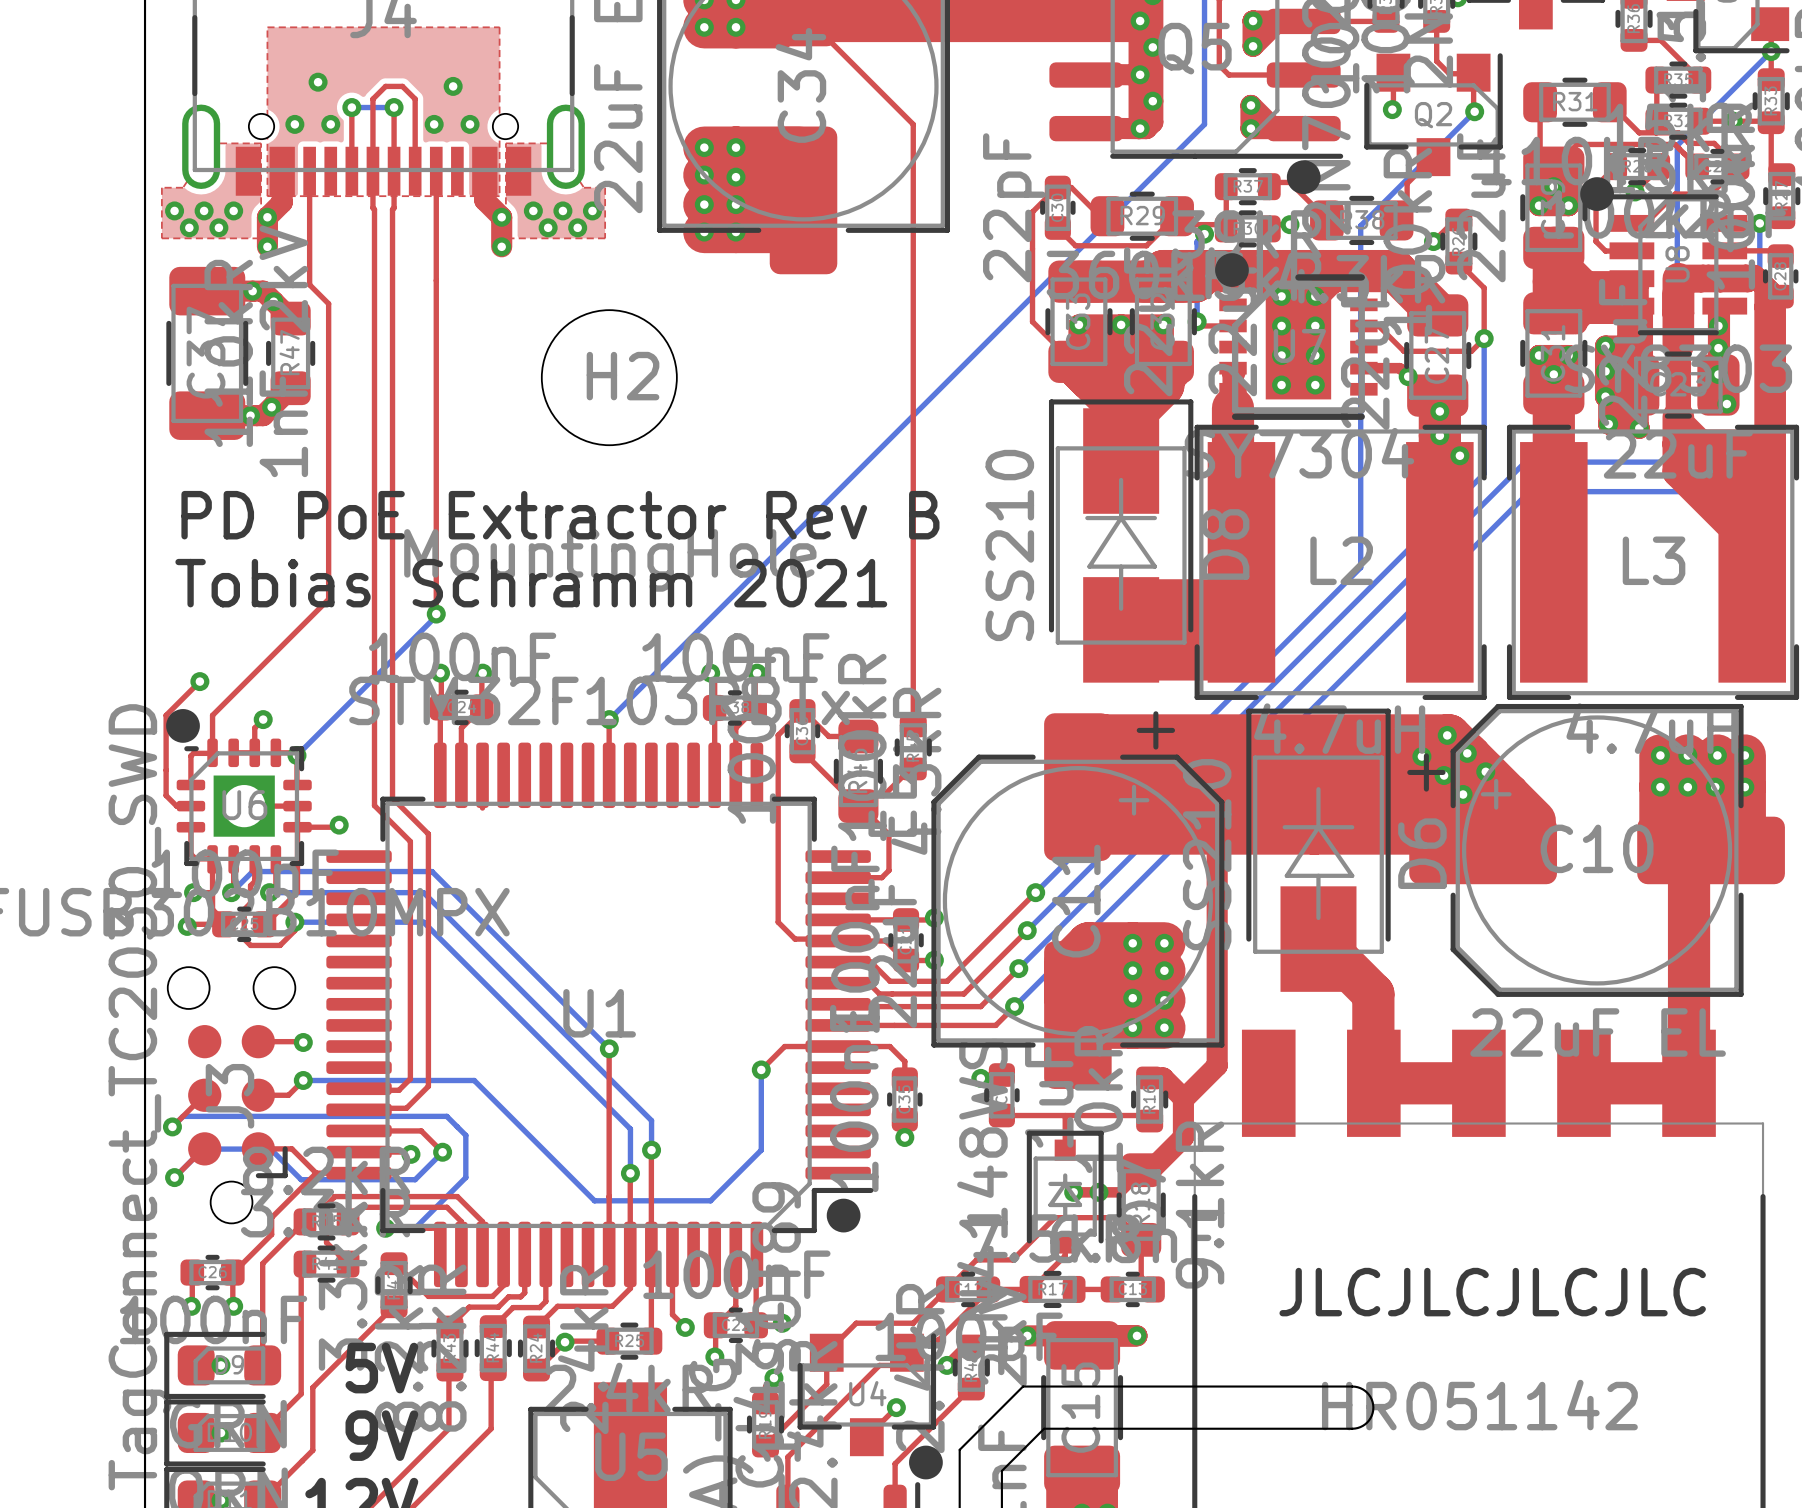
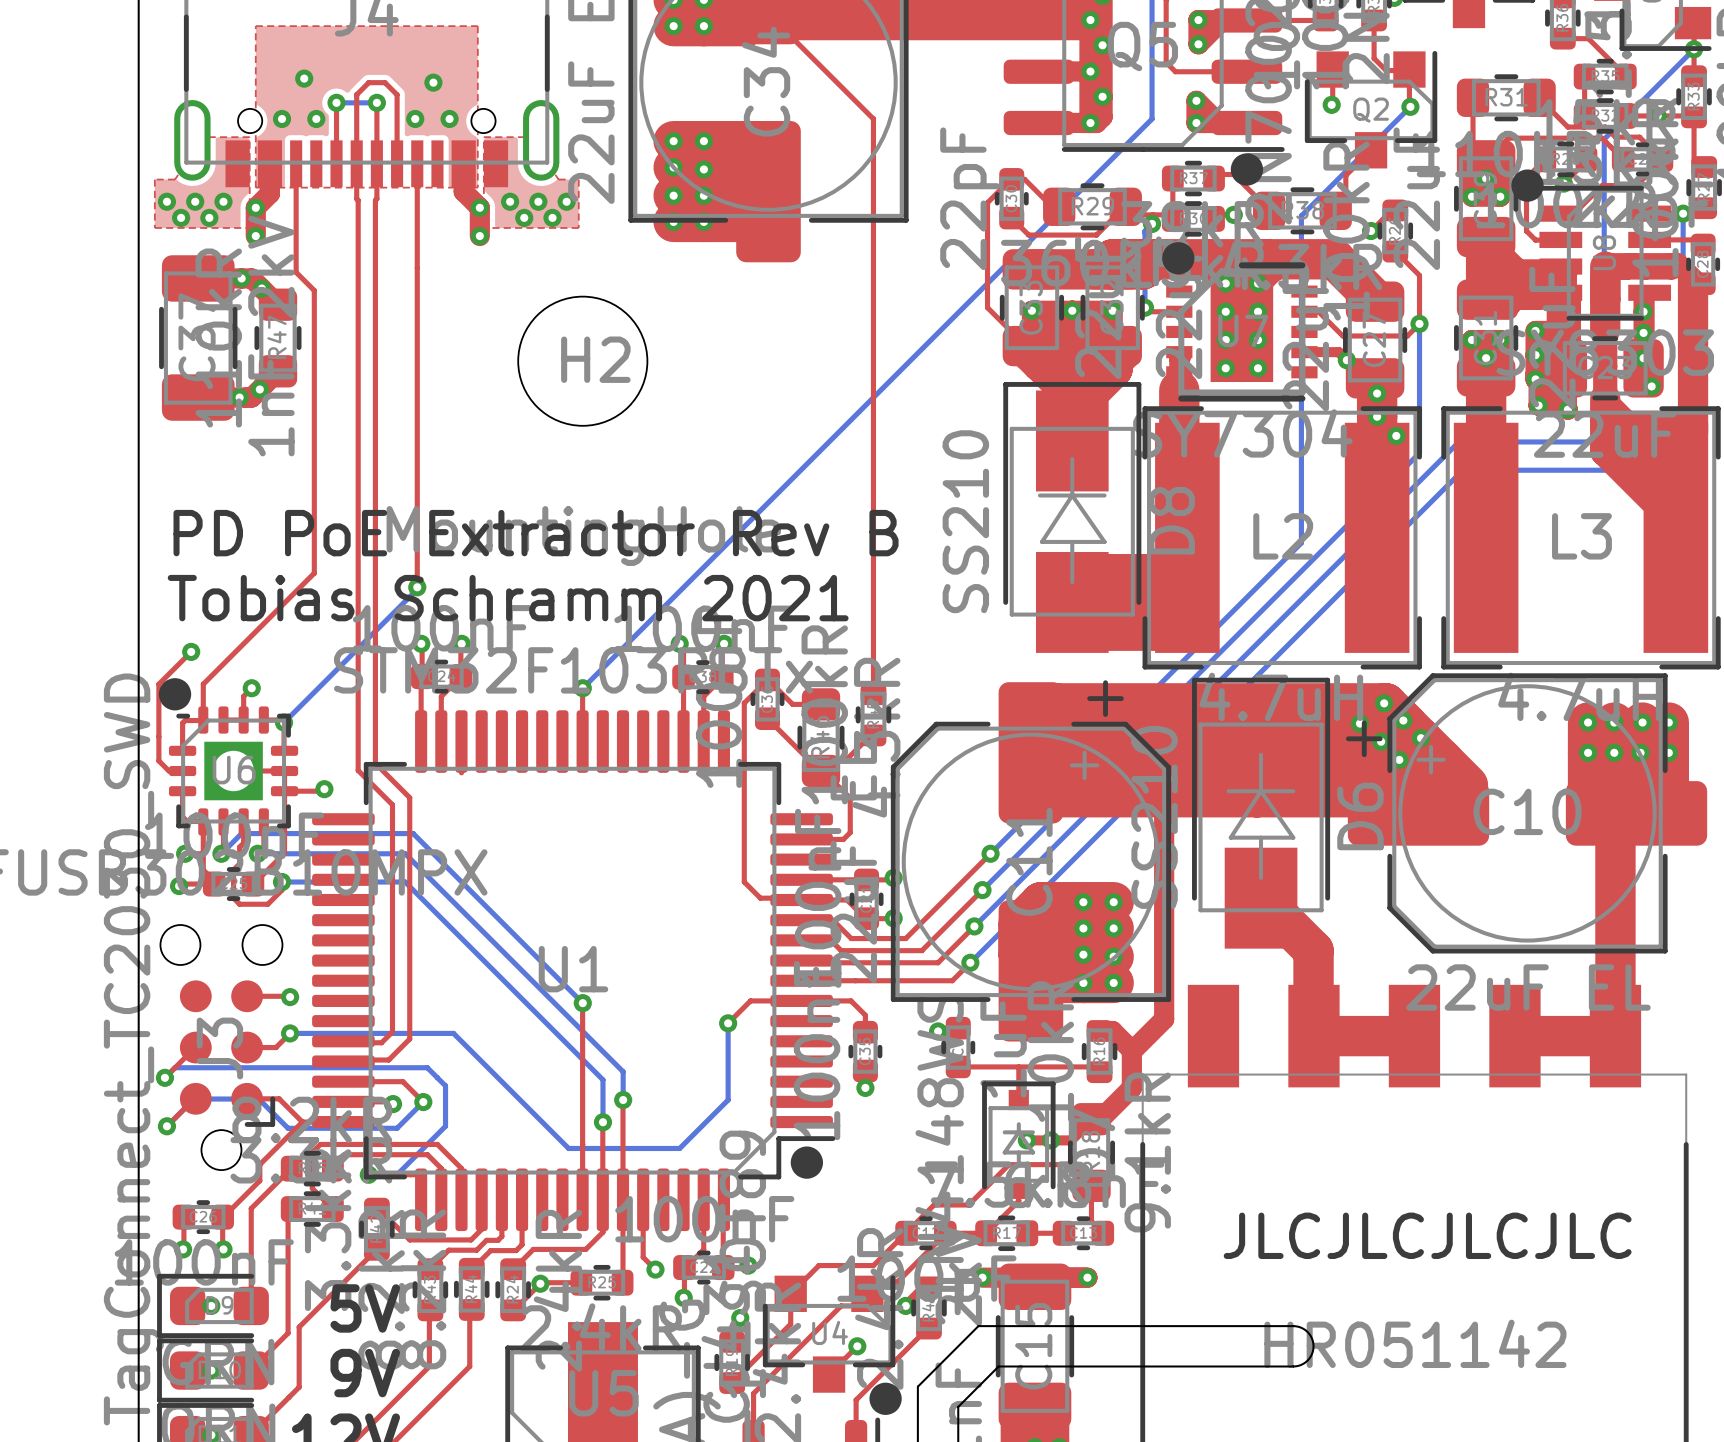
text position: PD PoE Extractor Rev B (560, 515) -> PD PoE Extractor Rev B (536, 533)
text position: Tobias Schramm 2021 (531, 583) -> Tobias Schramm 2021 (508, 598)

